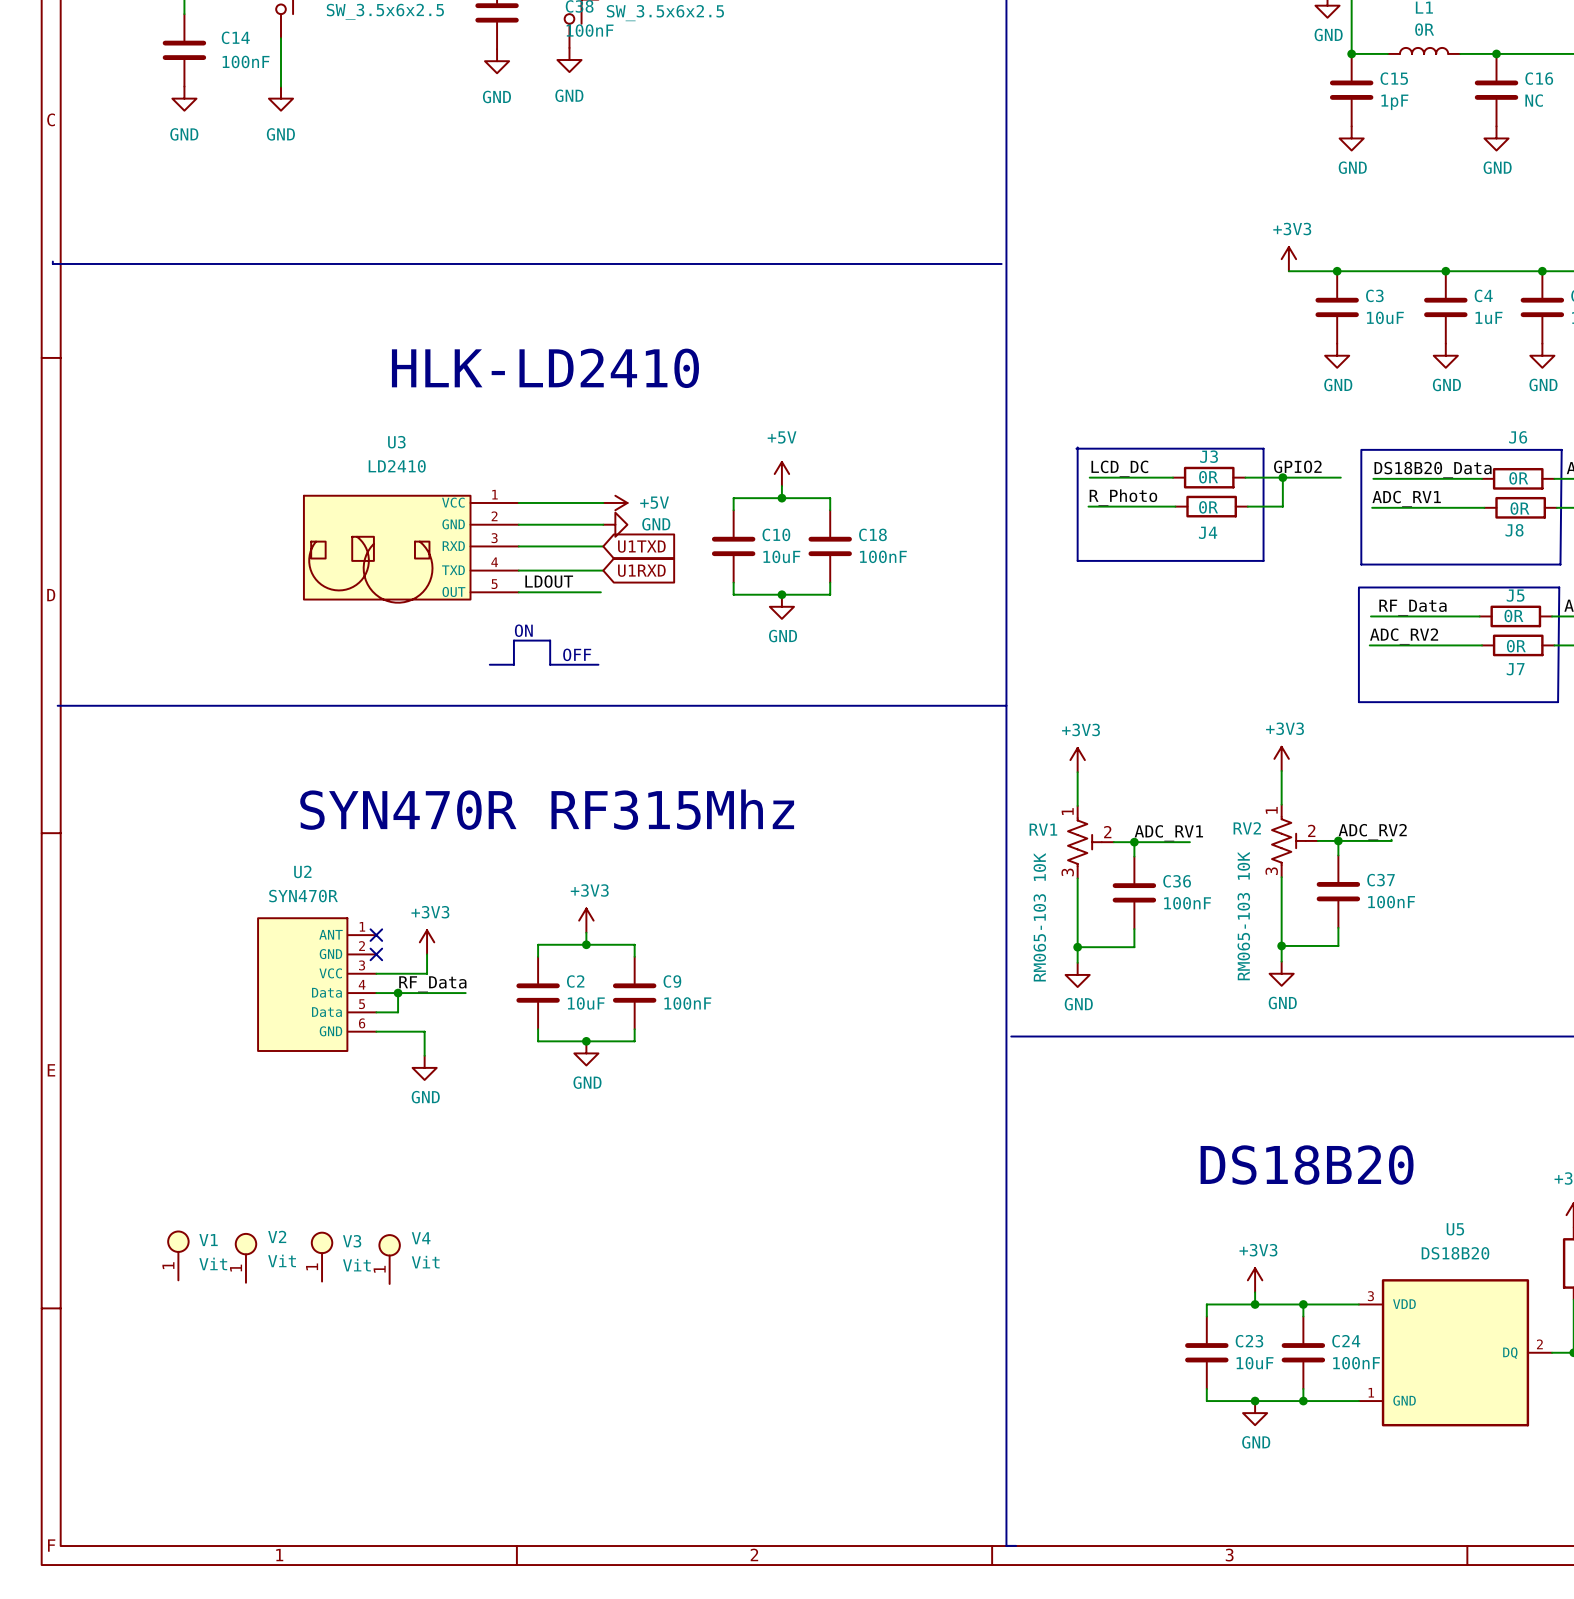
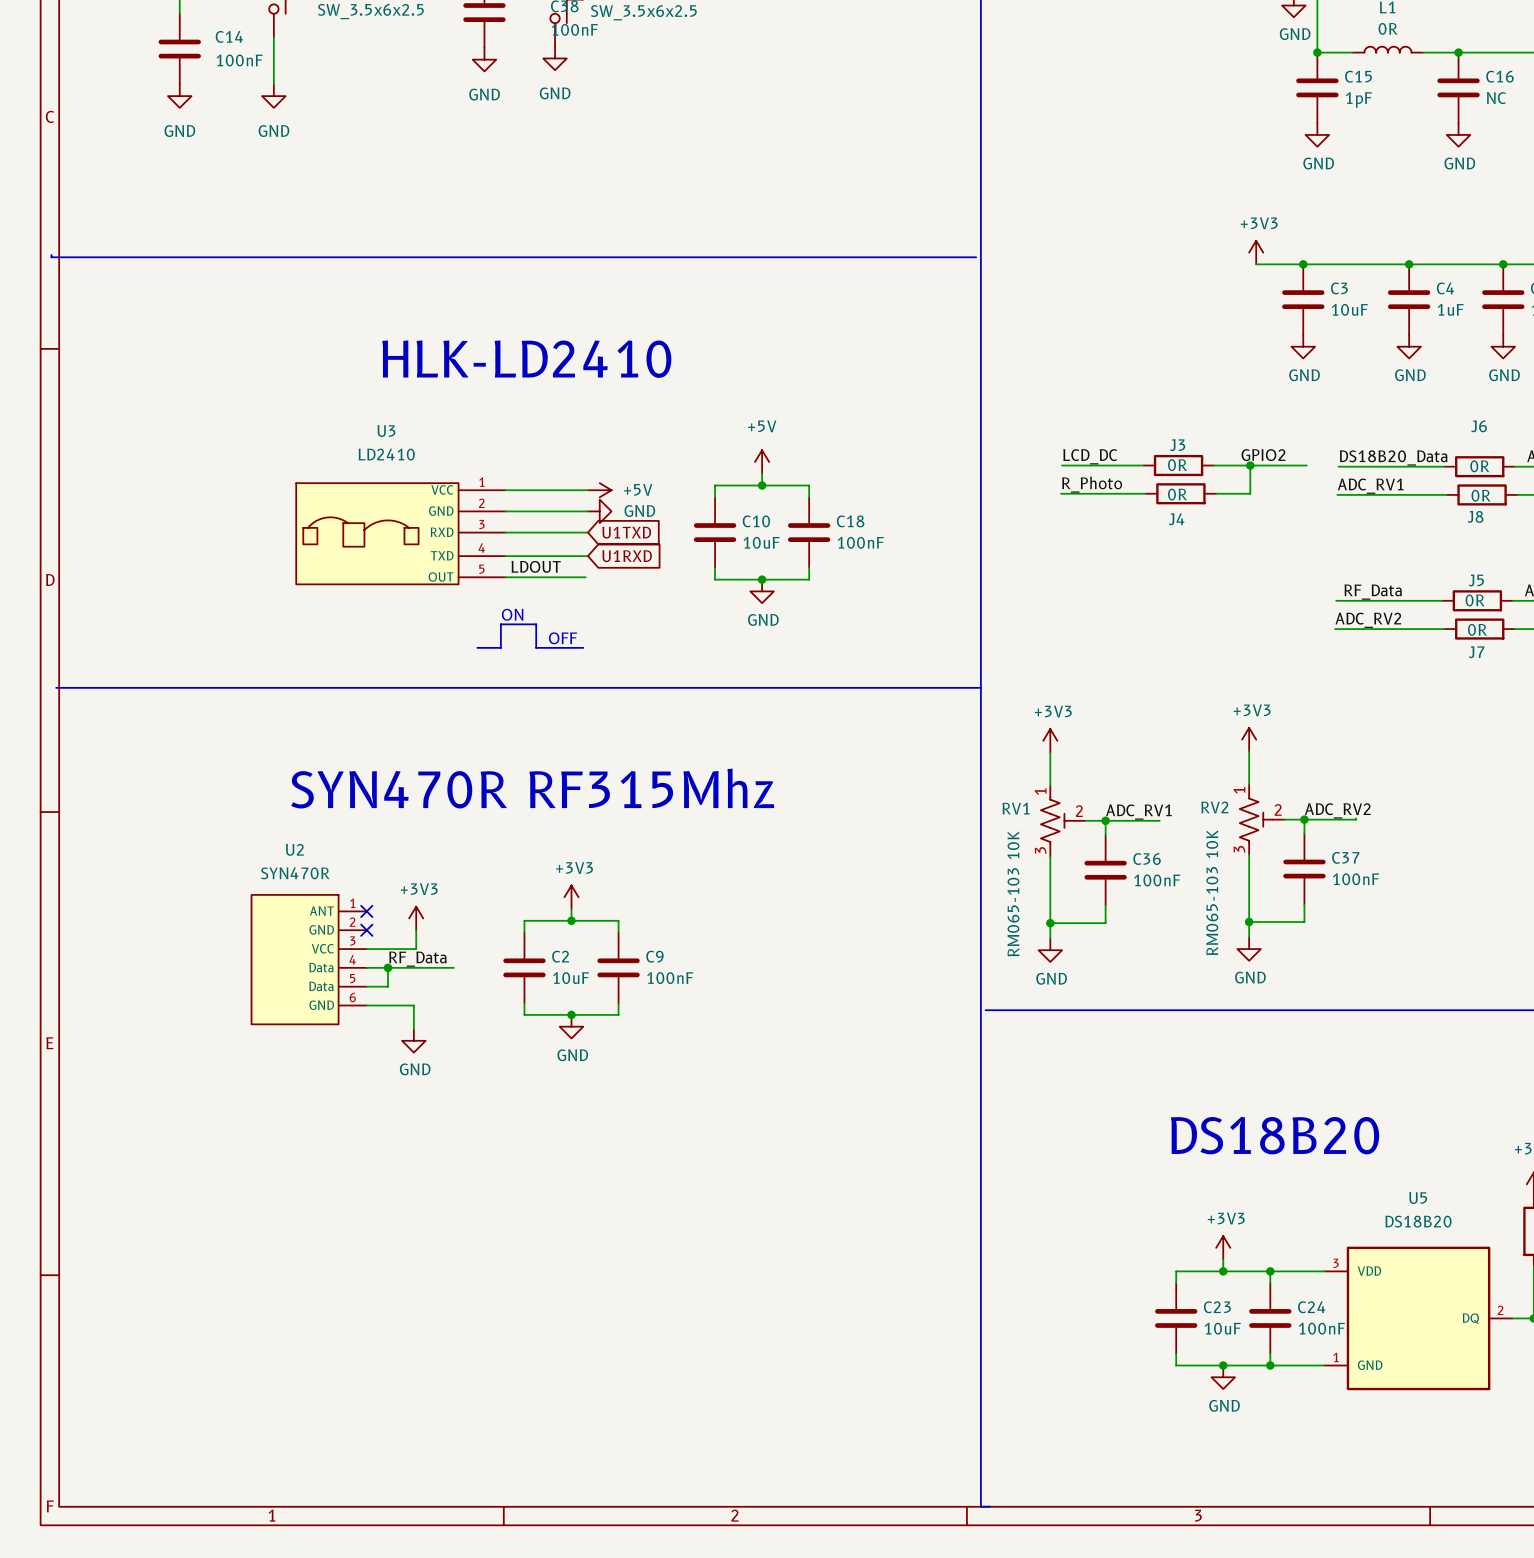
line: (1077, 447) (1077, 560) (1263, 560) (1263, 448) (1076, 448) -> none
line: (1361, 449) (1561, 449) (1560, 564) (1361, 564) (1361, 451) -> none
U3 symbol: [303, 495, 519, 603] -> [296, 483, 506, 585]
line: (1358, 587) (1559, 587) (1558, 702) (1358, 702) (1358, 588) -> none
V1: Vit (178, 1255) -> none
V3: Vit (322, 1257) -> none
V2: Vit (245, 1258) -> none
V4: Vit (389, 1259) -> none

